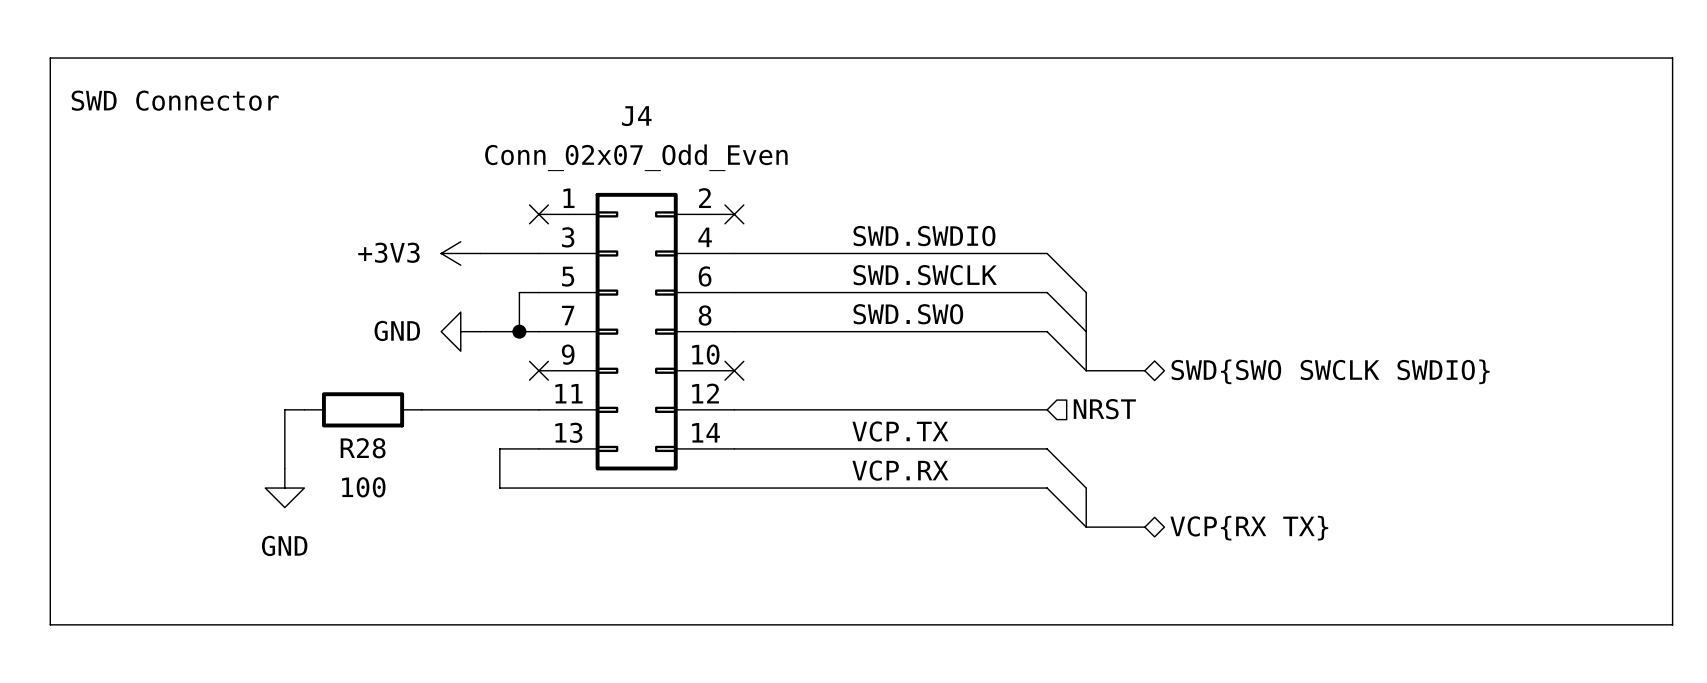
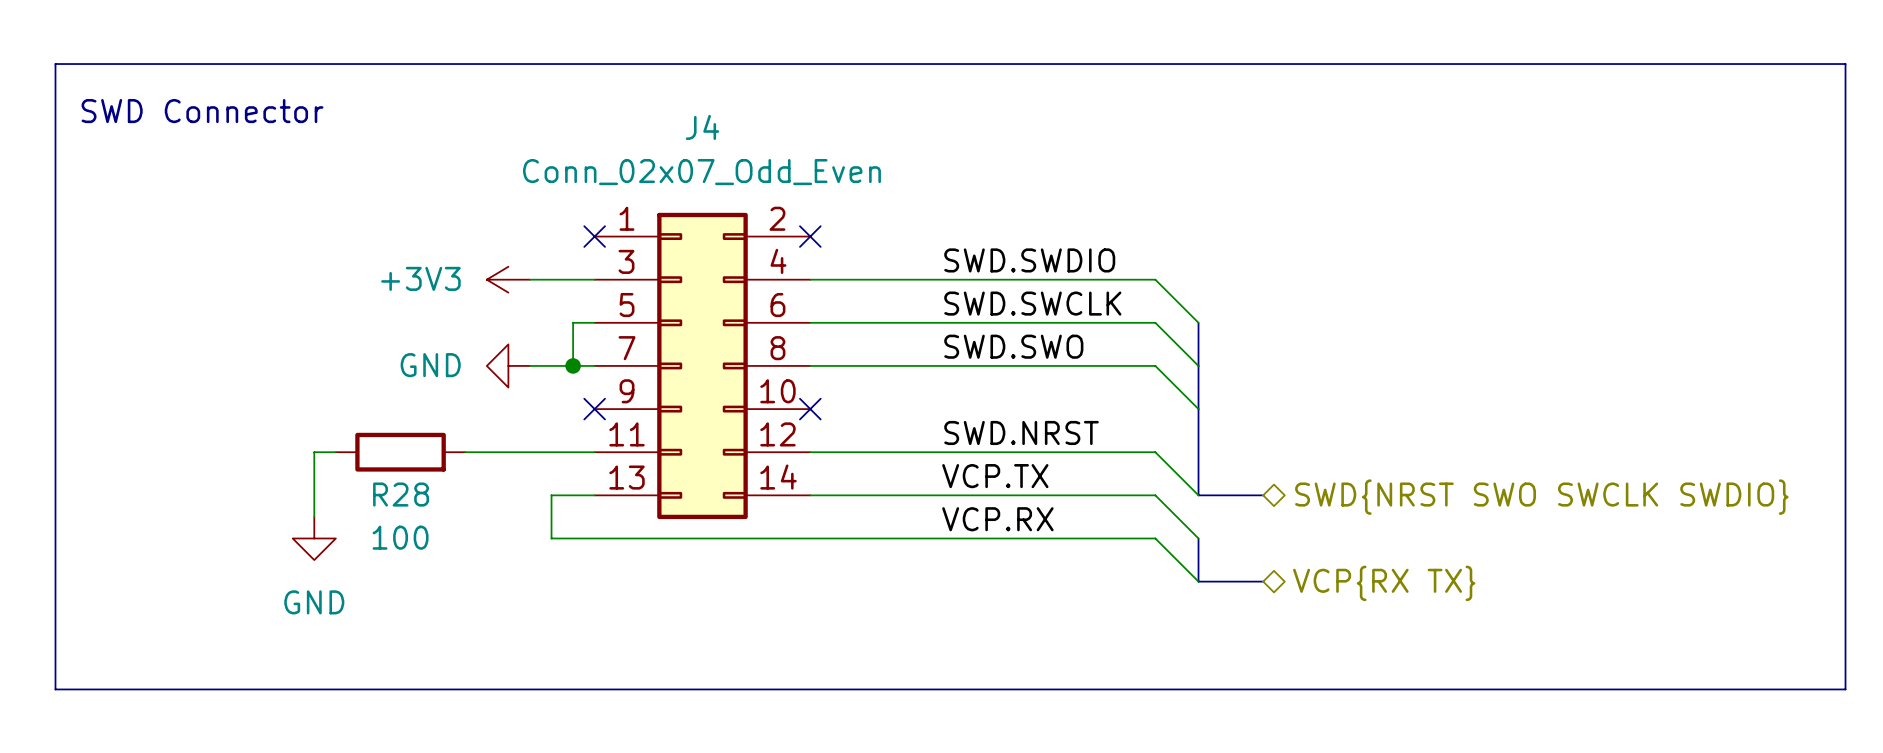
bus: (1086, 370) (1144, 370) -> (1198, 409) (1198, 495) (1263, 495)
hierarchical label: SWD{SWO SWCLK SWDIO} (1330, 371) -> none
label: none -> SWD.NRST (1021, 432)
wire: none -> (1155, 452) (1198, 495)
hierarchical label: NRST (1104, 409) -> none
hierarchical label: none -> SWD{NRST SWO SWCLK SWDIO} (1541, 497)

